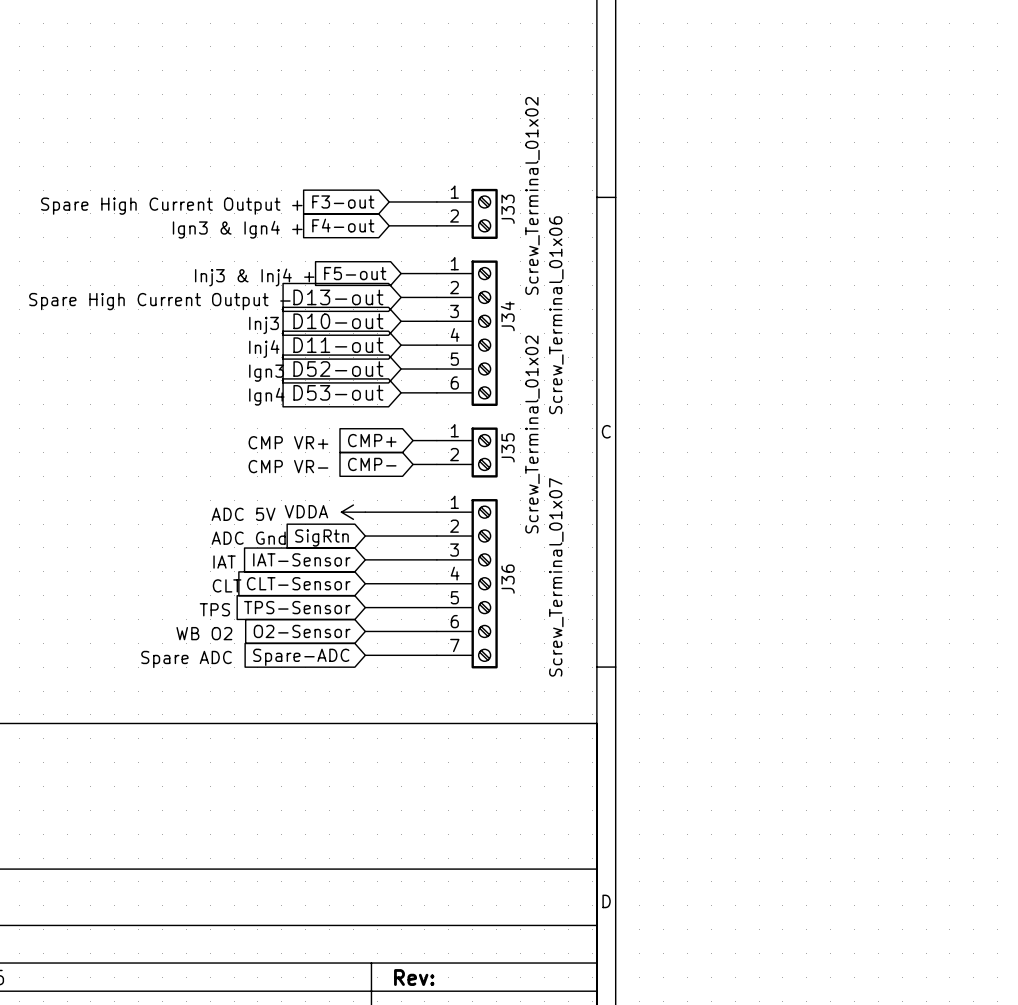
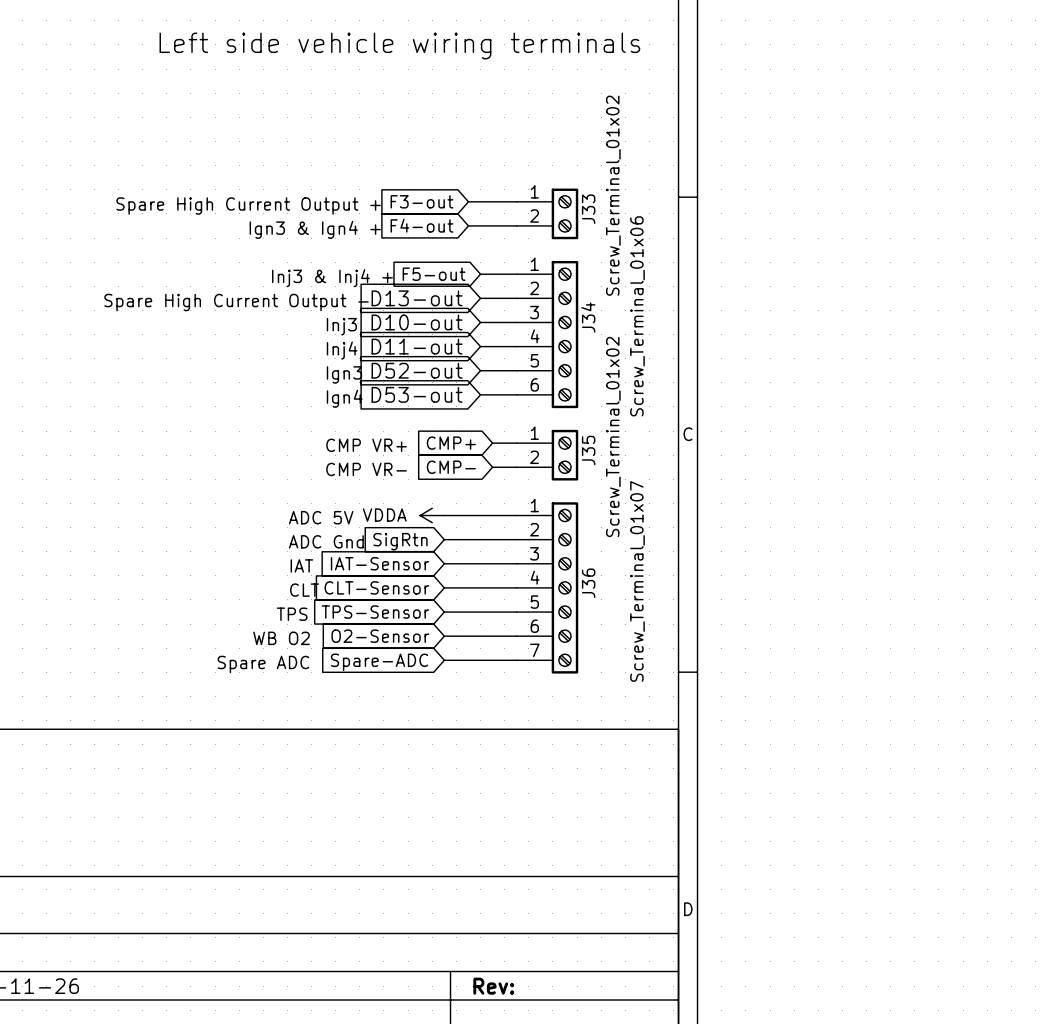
text: none -> Left side vehicle wiring terminals (399, 45)

